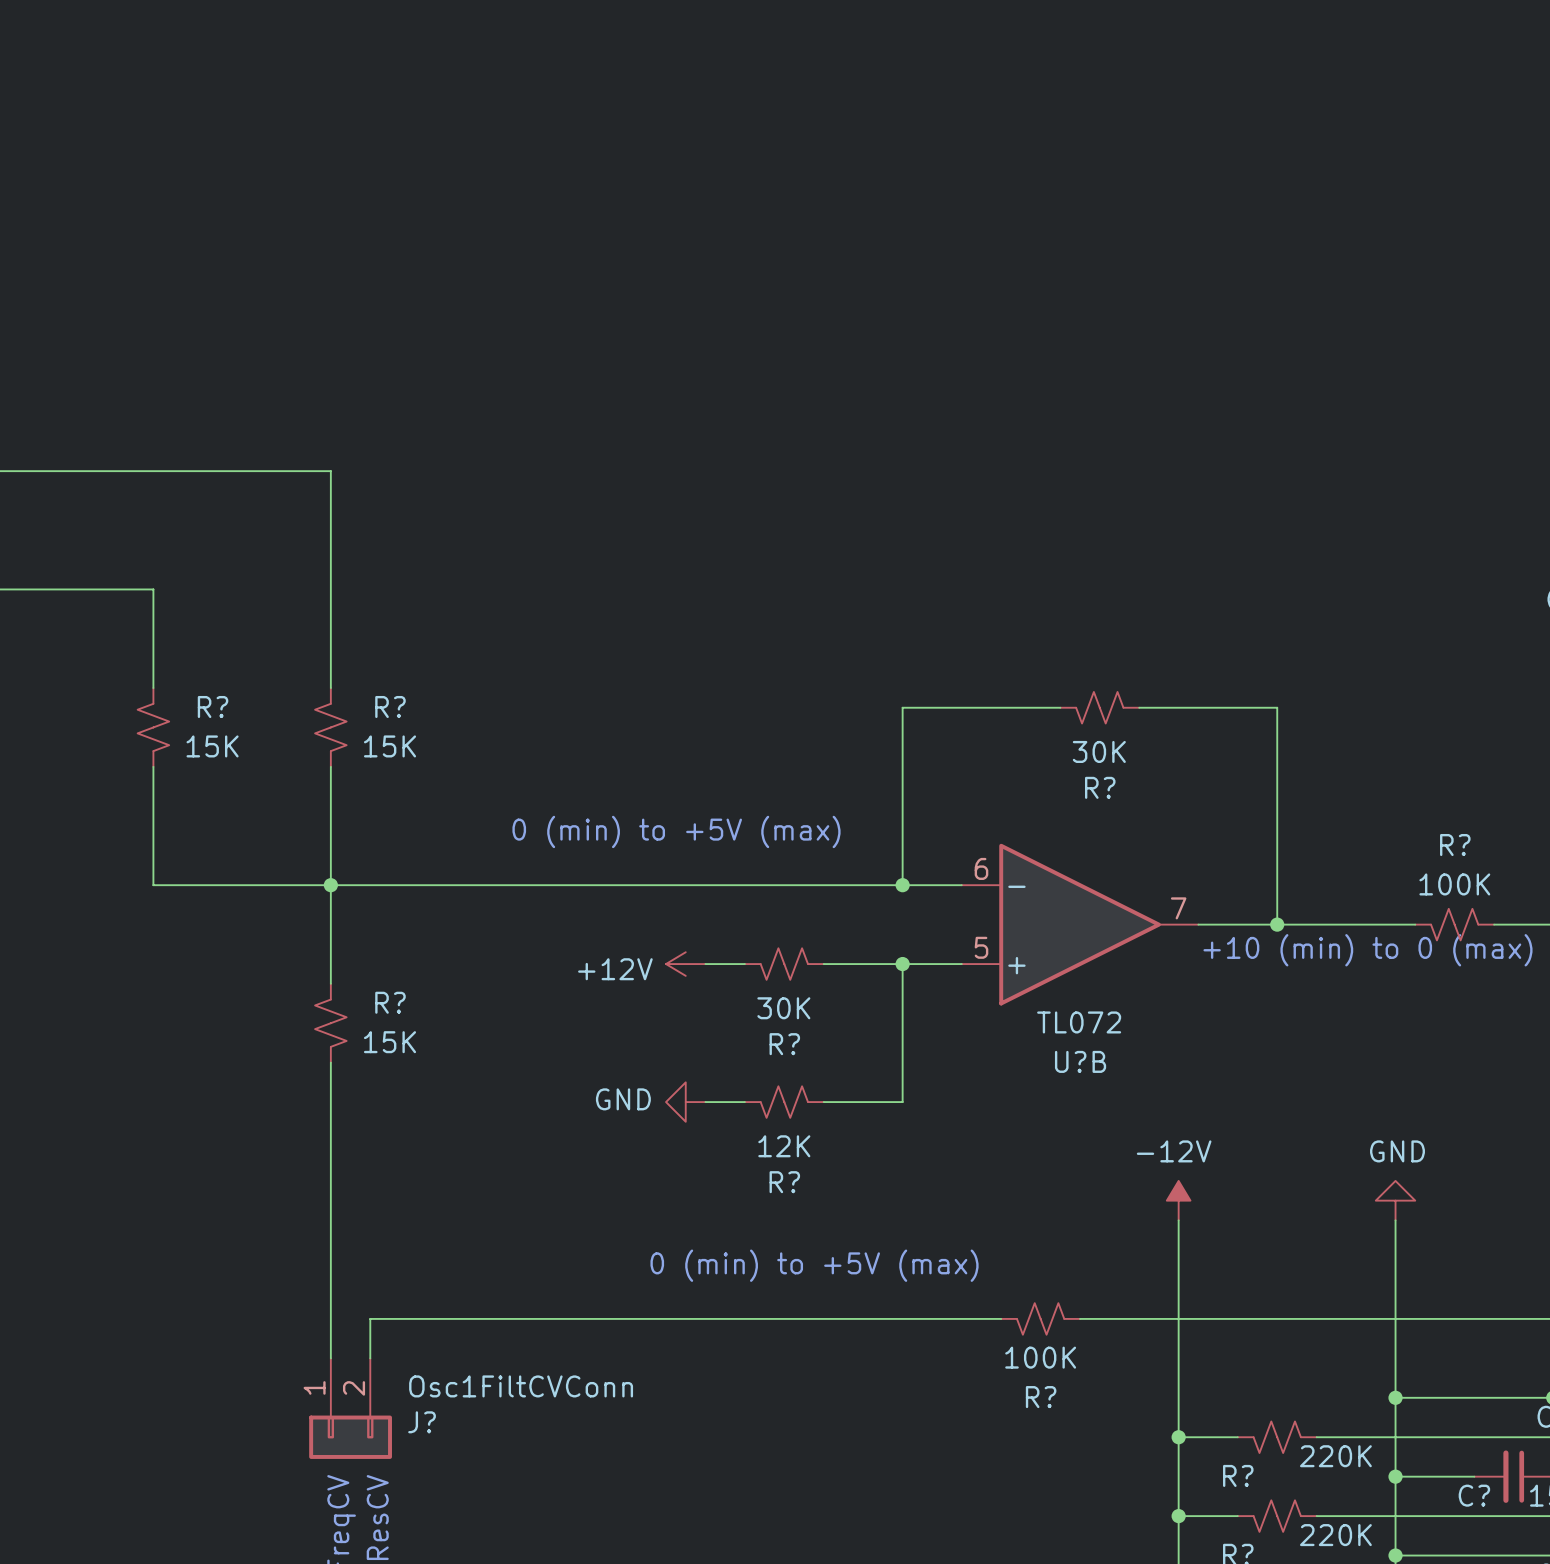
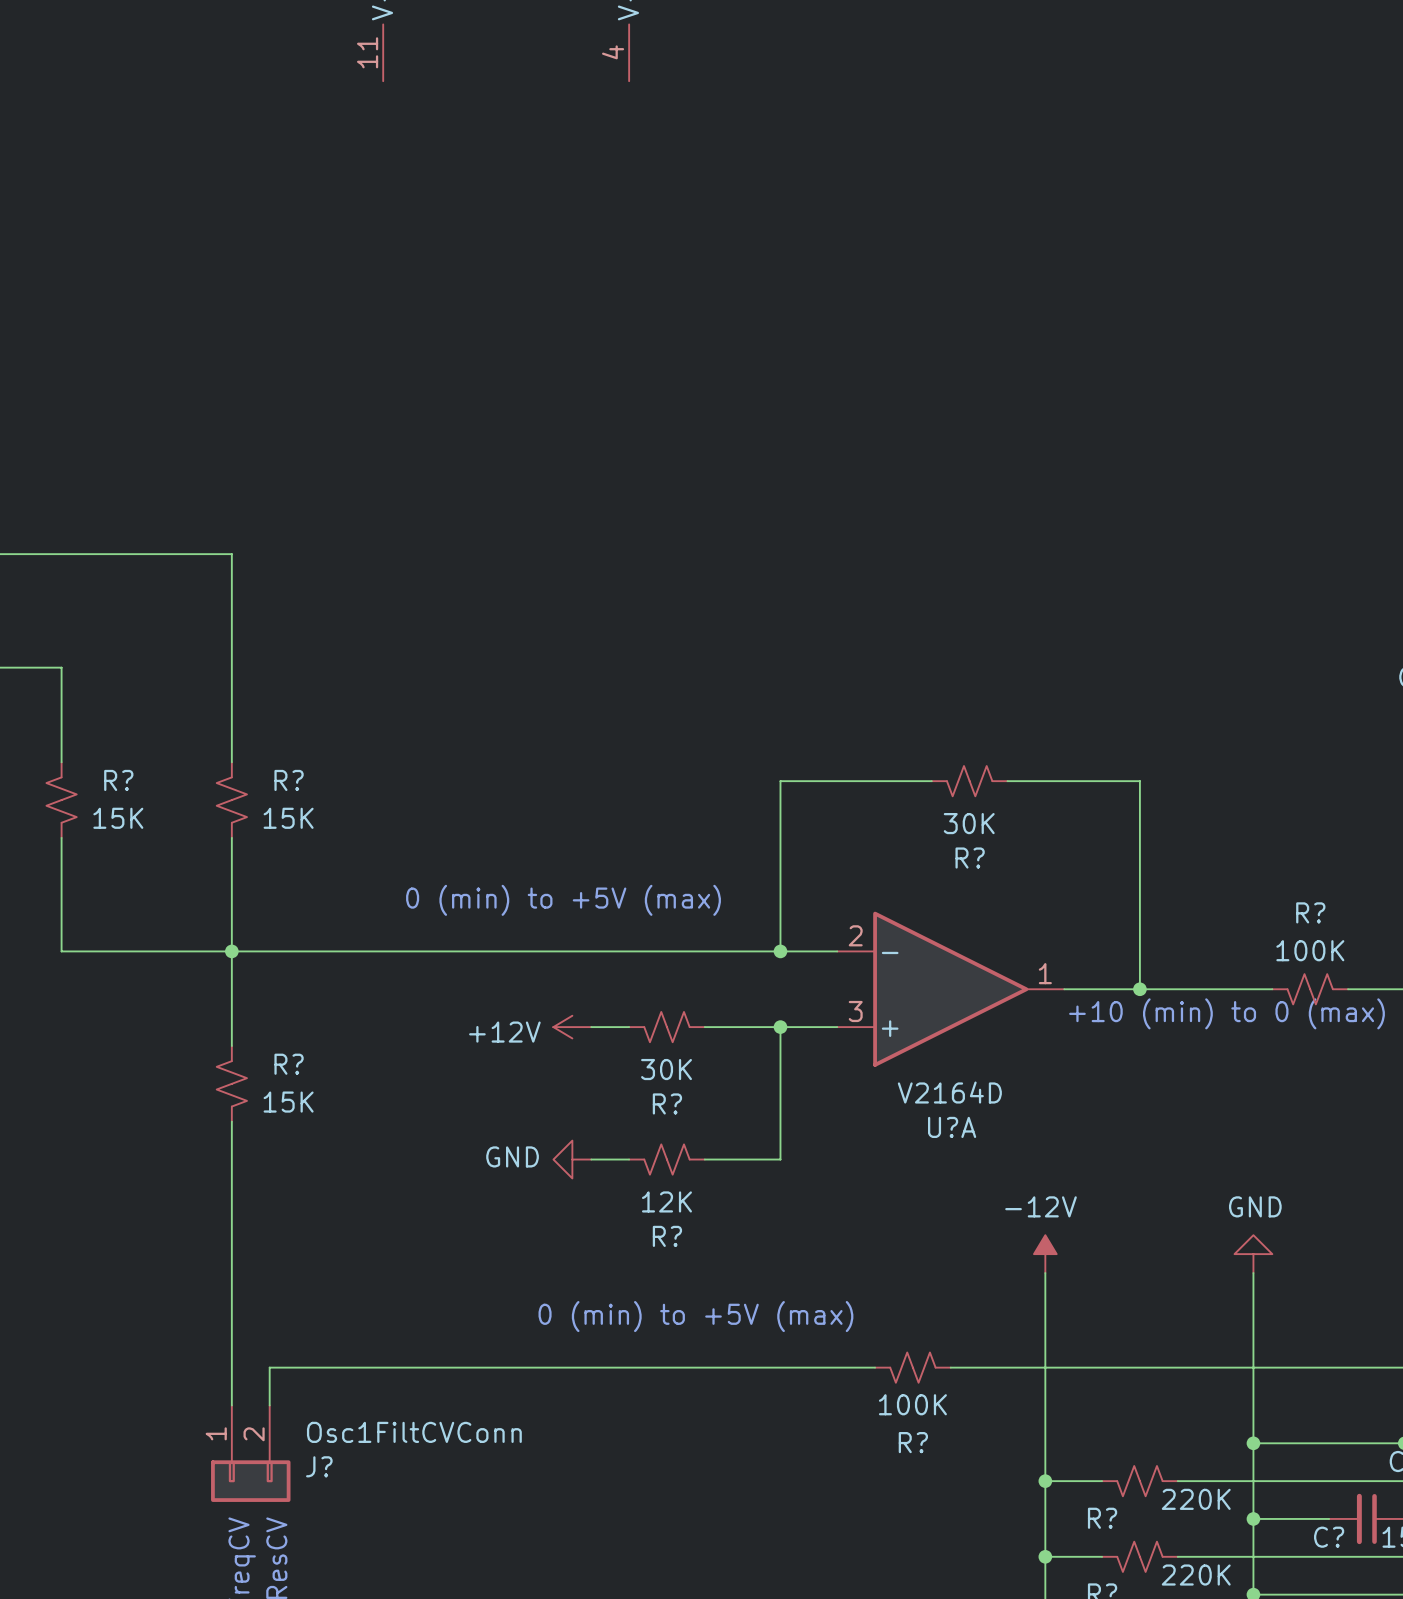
U?B pin number: 6 (981, 868) -> 2 (855, 935)
U?B pin number: 7 (1178, 908) -> 1 (1045, 973)
U?B pin number: 5 (981, 947) -> 3 (855, 1011)
U?B value: TL072 (1079, 1022) -> V2164D (949, 1092)
U?B name: U?B (1080, 1061) -> U?A (952, 1127)

